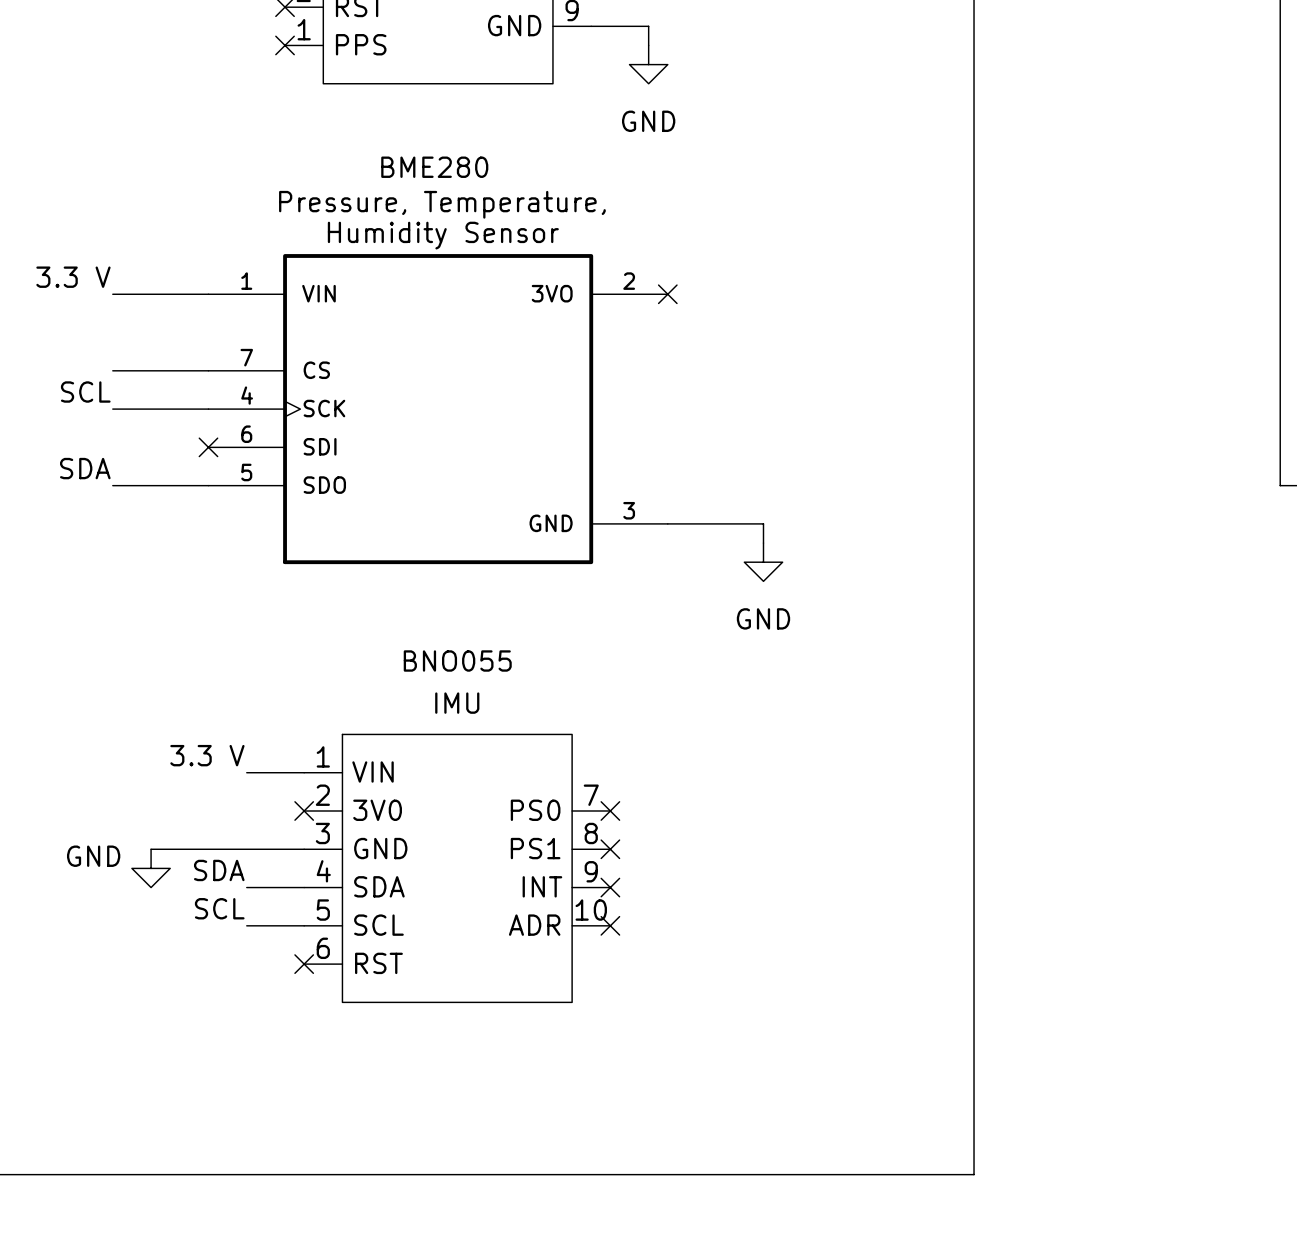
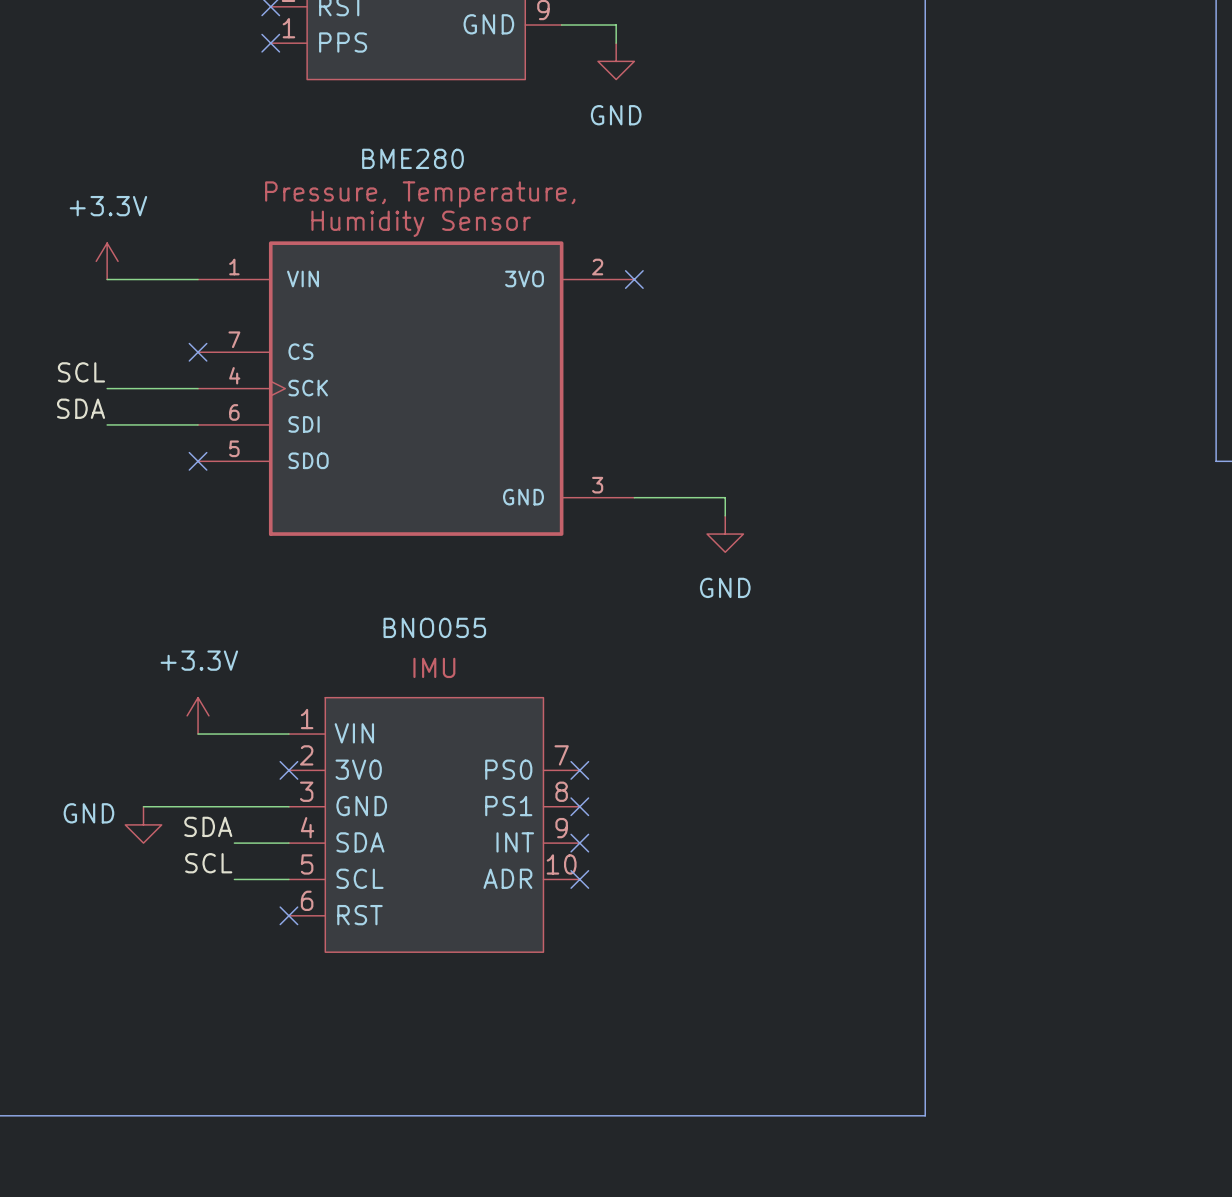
power symbol: none -> +3.3V (107, 261)
label: 3.3 V (73, 277) -> none
wire: (112, 370) (208, 370) -> none
no-connect mark: none -> (198, 352)
no-connect mark: (208, 447) -> none
label position: SDA (85, 468) -> SDA (81, 408)
wire: (112, 485) (208, 485) -> (107, 424) (198, 424)
no-connect mark: none -> (198, 461)
power symbol: none -> +3.3V (198, 715)
label: 3.3 V (207, 755) -> none
wire: none -> (198, 734) (234, 734)

